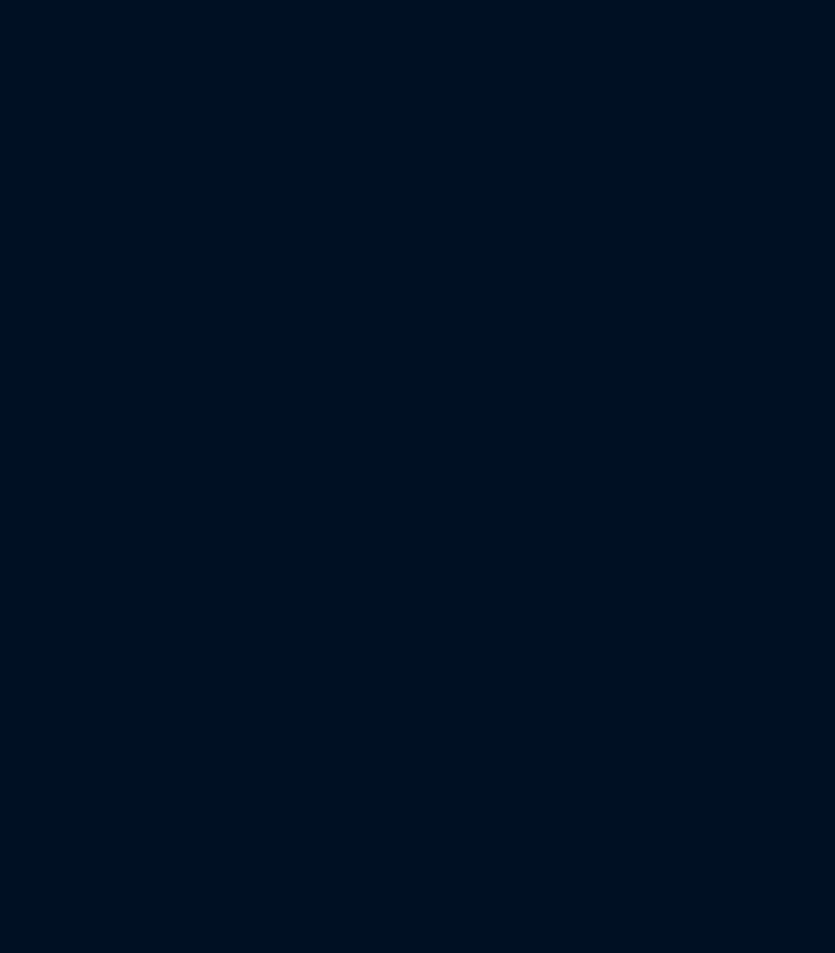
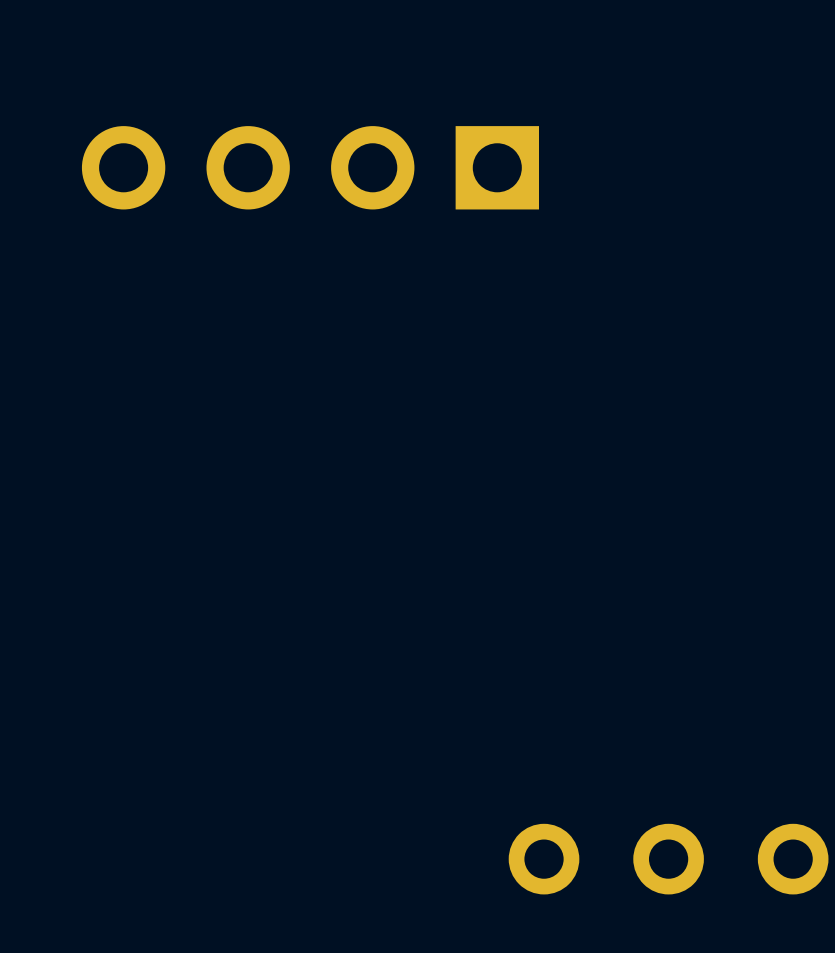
part: none -> (310, 167)
part: none -> (668, 859)

